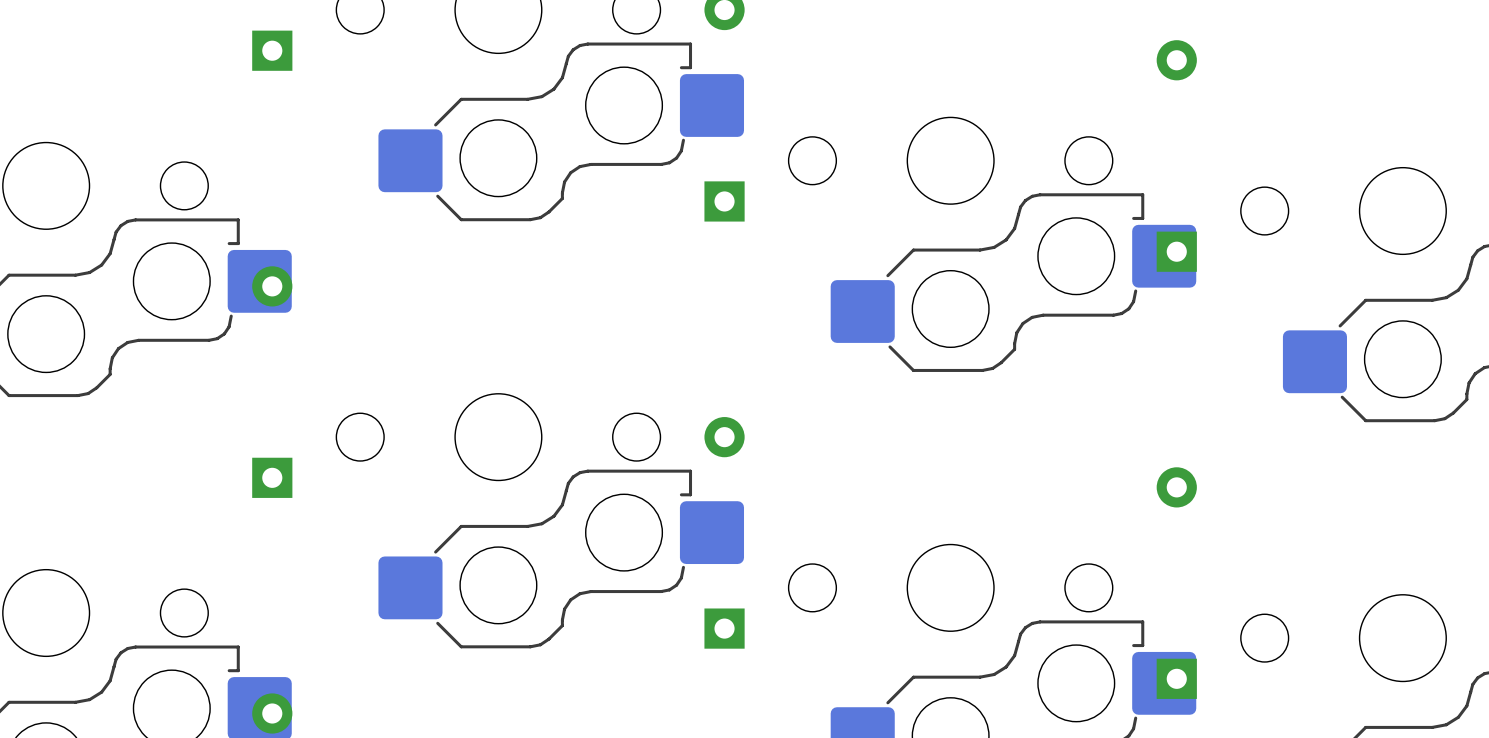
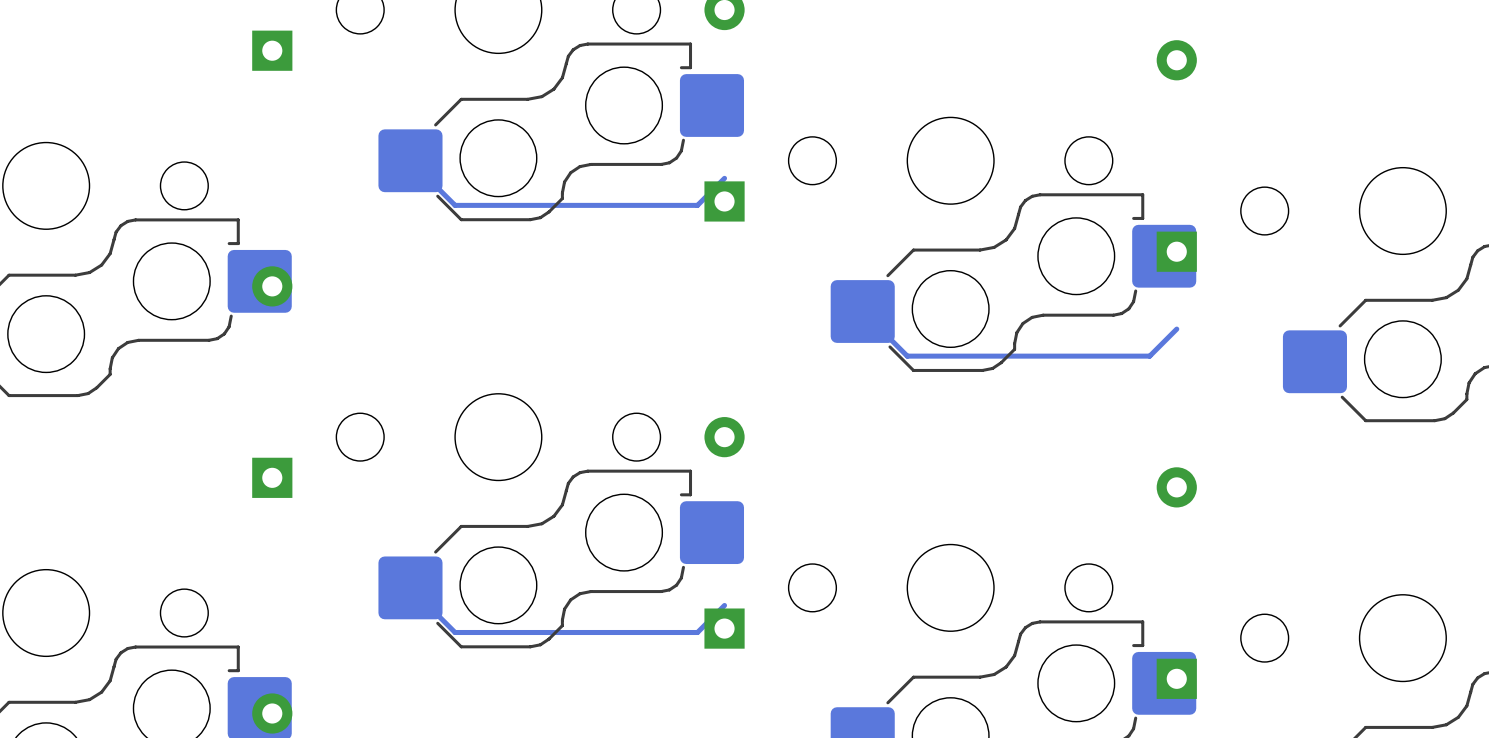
bottom track: none -> (410, 160) (455, 205) (697, 205) (724, 178)
bottom track: none -> (862, 311) (907, 356) (1149, 356) (1176, 329)
bottom track: none -> (410, 587) (455, 632) (697, 632) (724, 605)

